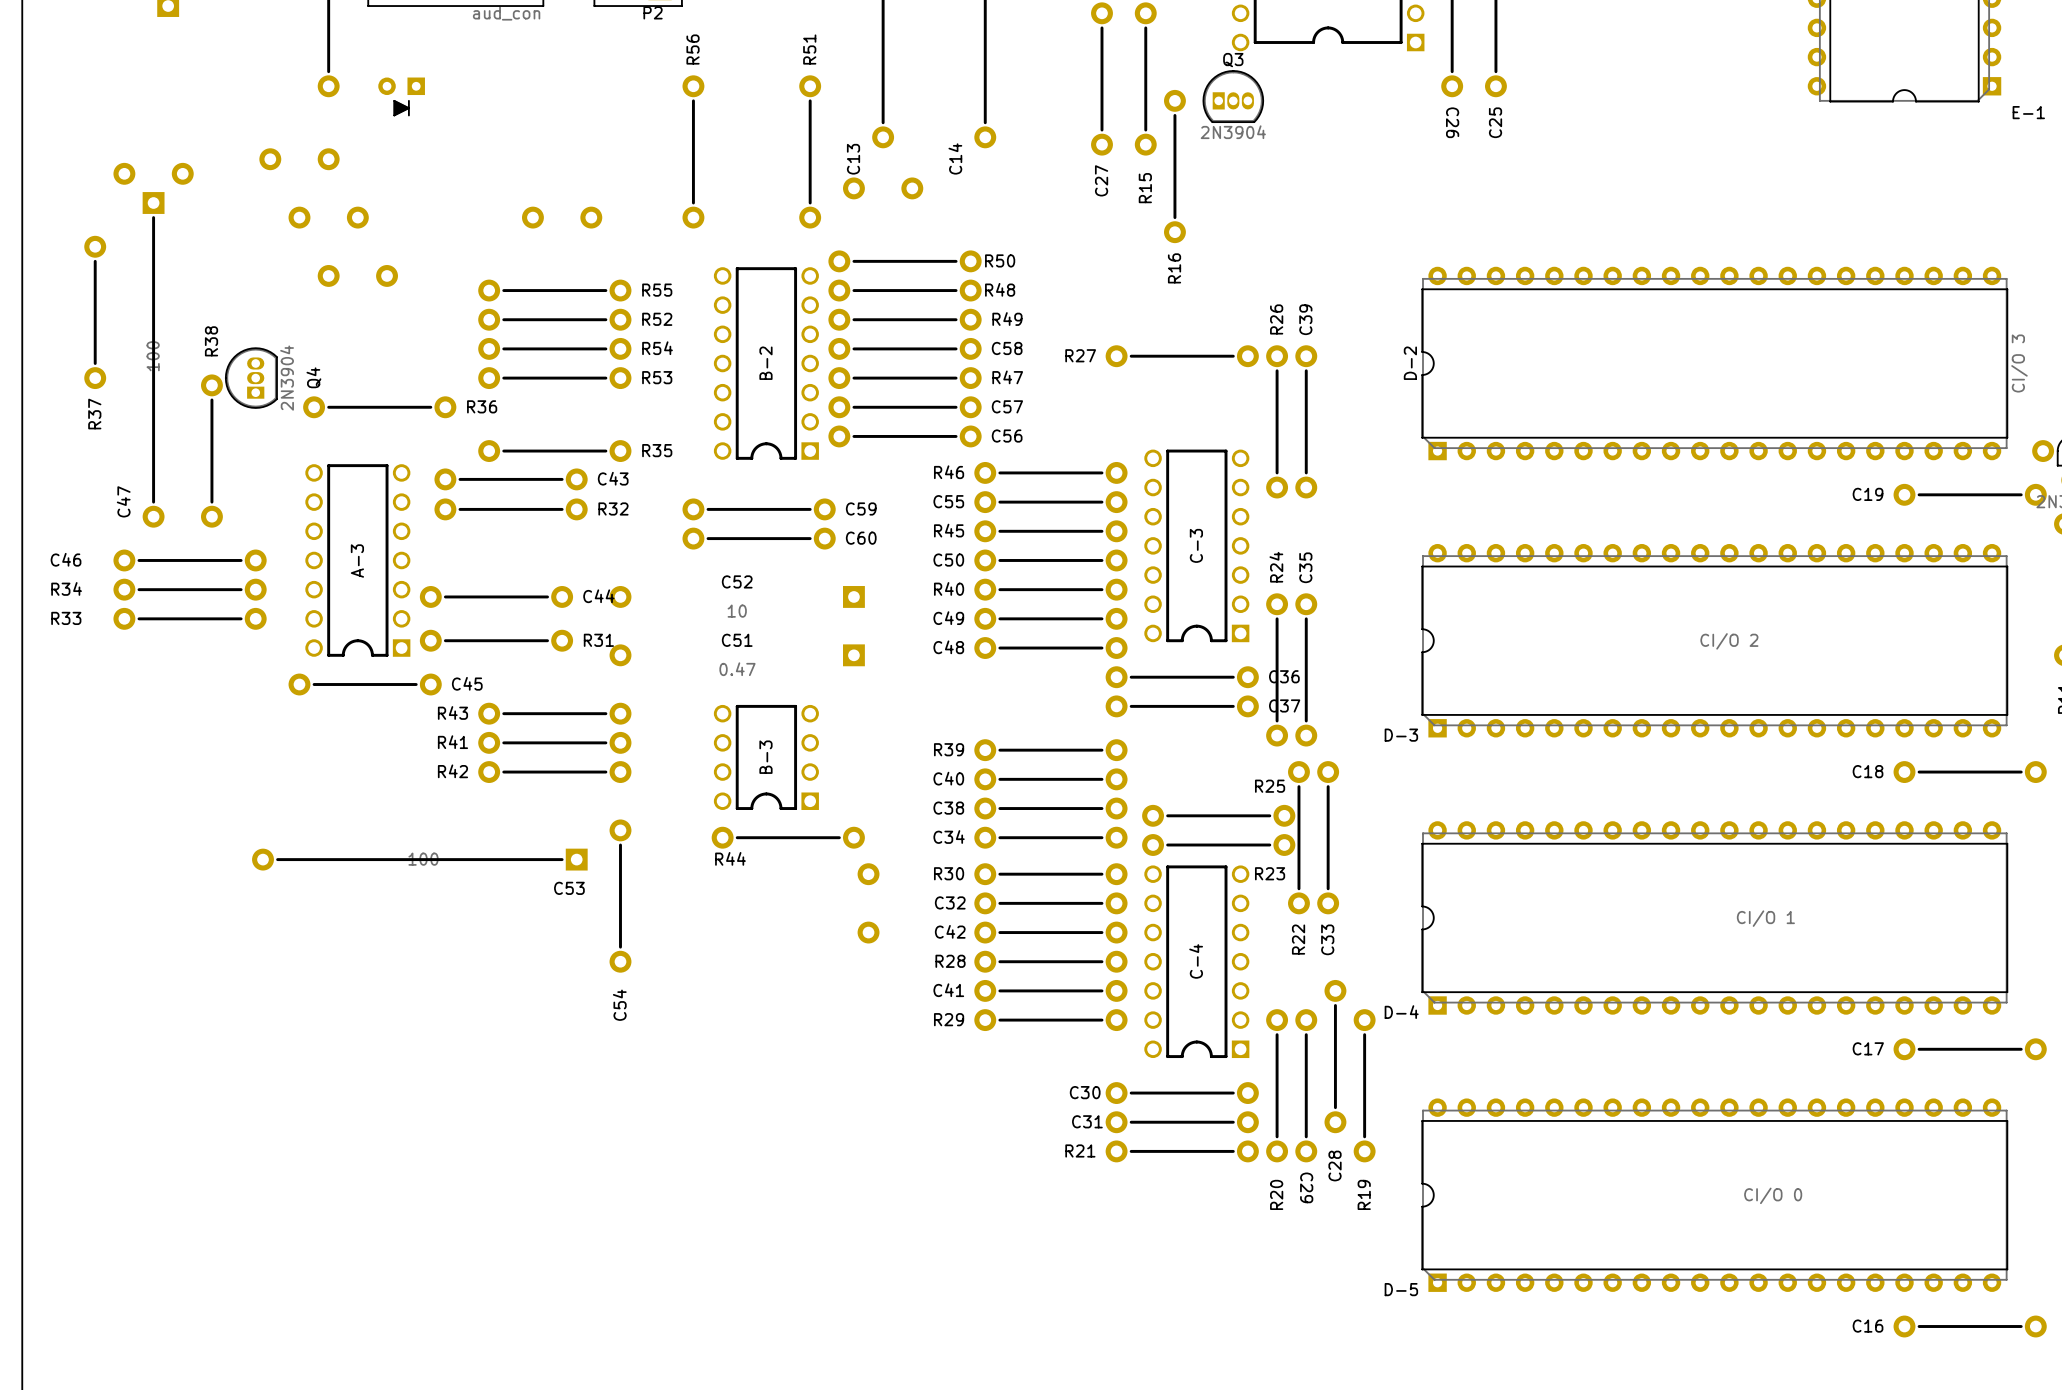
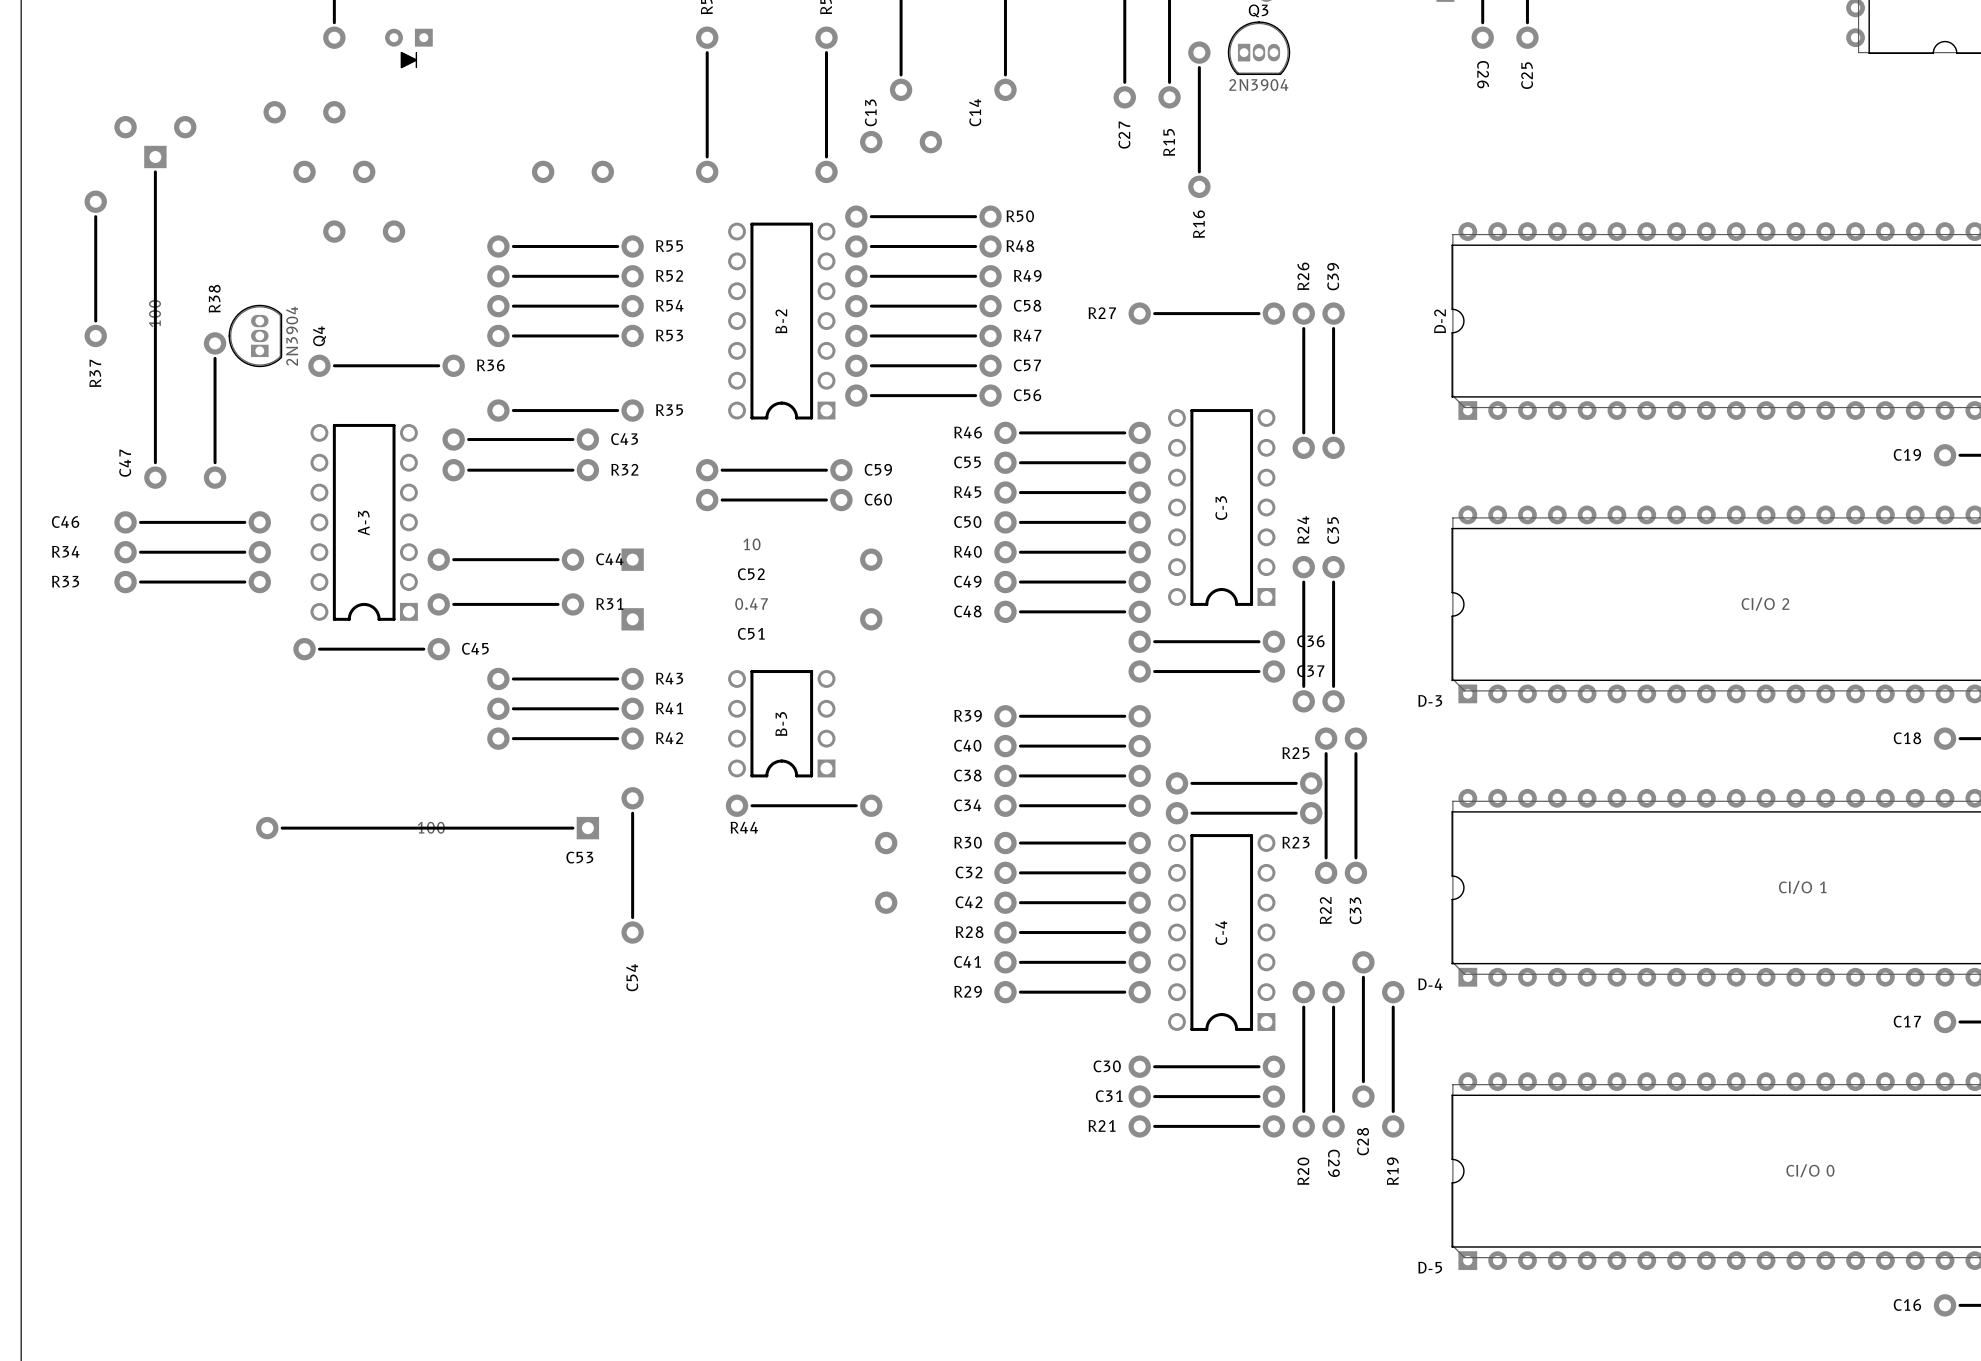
C52 rotation: 0° (737, 596) -> 180° (751, 559)
C51 rotation: 0° (737, 655) -> 180° (751, 619)
R43 name position: R43 (452, 712) -> R43 (669, 678)
R41 name position: R41 (452, 742) -> R41 (669, 708)
R42 name position: R42 (452, 771) -> R42 (669, 738)

